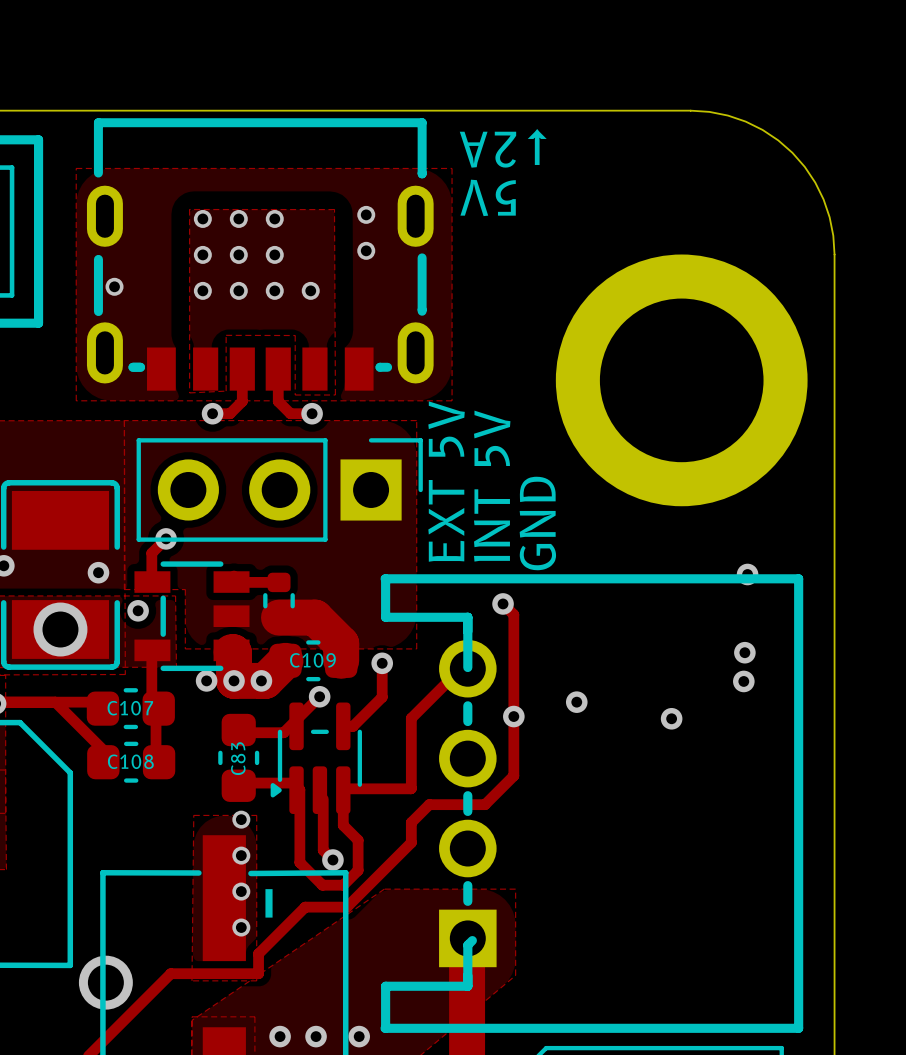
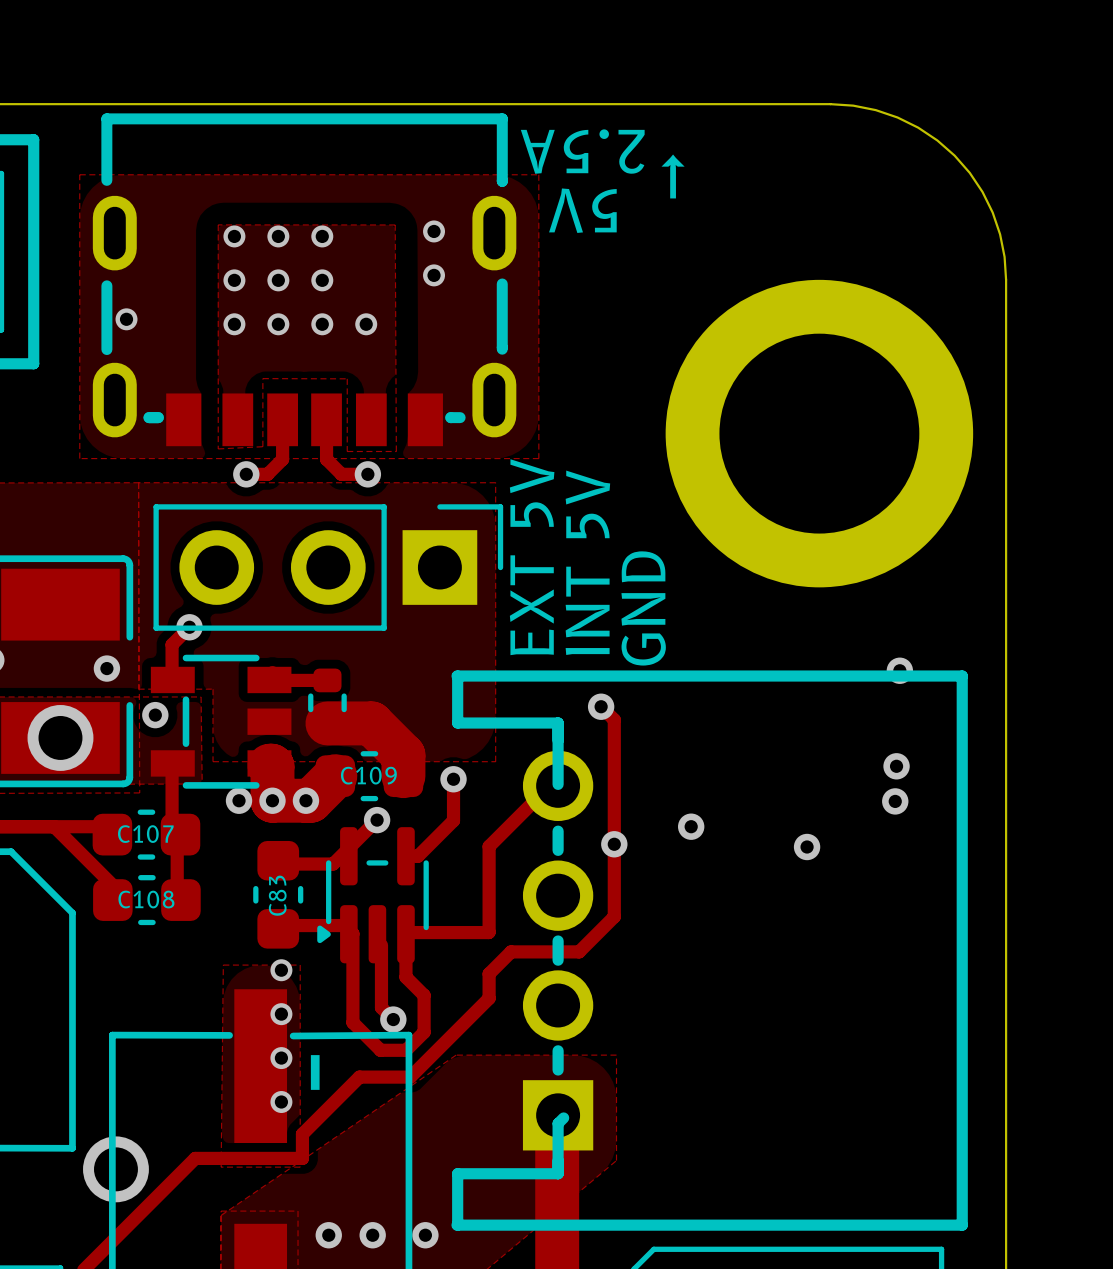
part text position: ↑ (537, 147) -> ↑ (673, 176)
part text: 2A (487, 149) -> 2.5A (582, 151)

